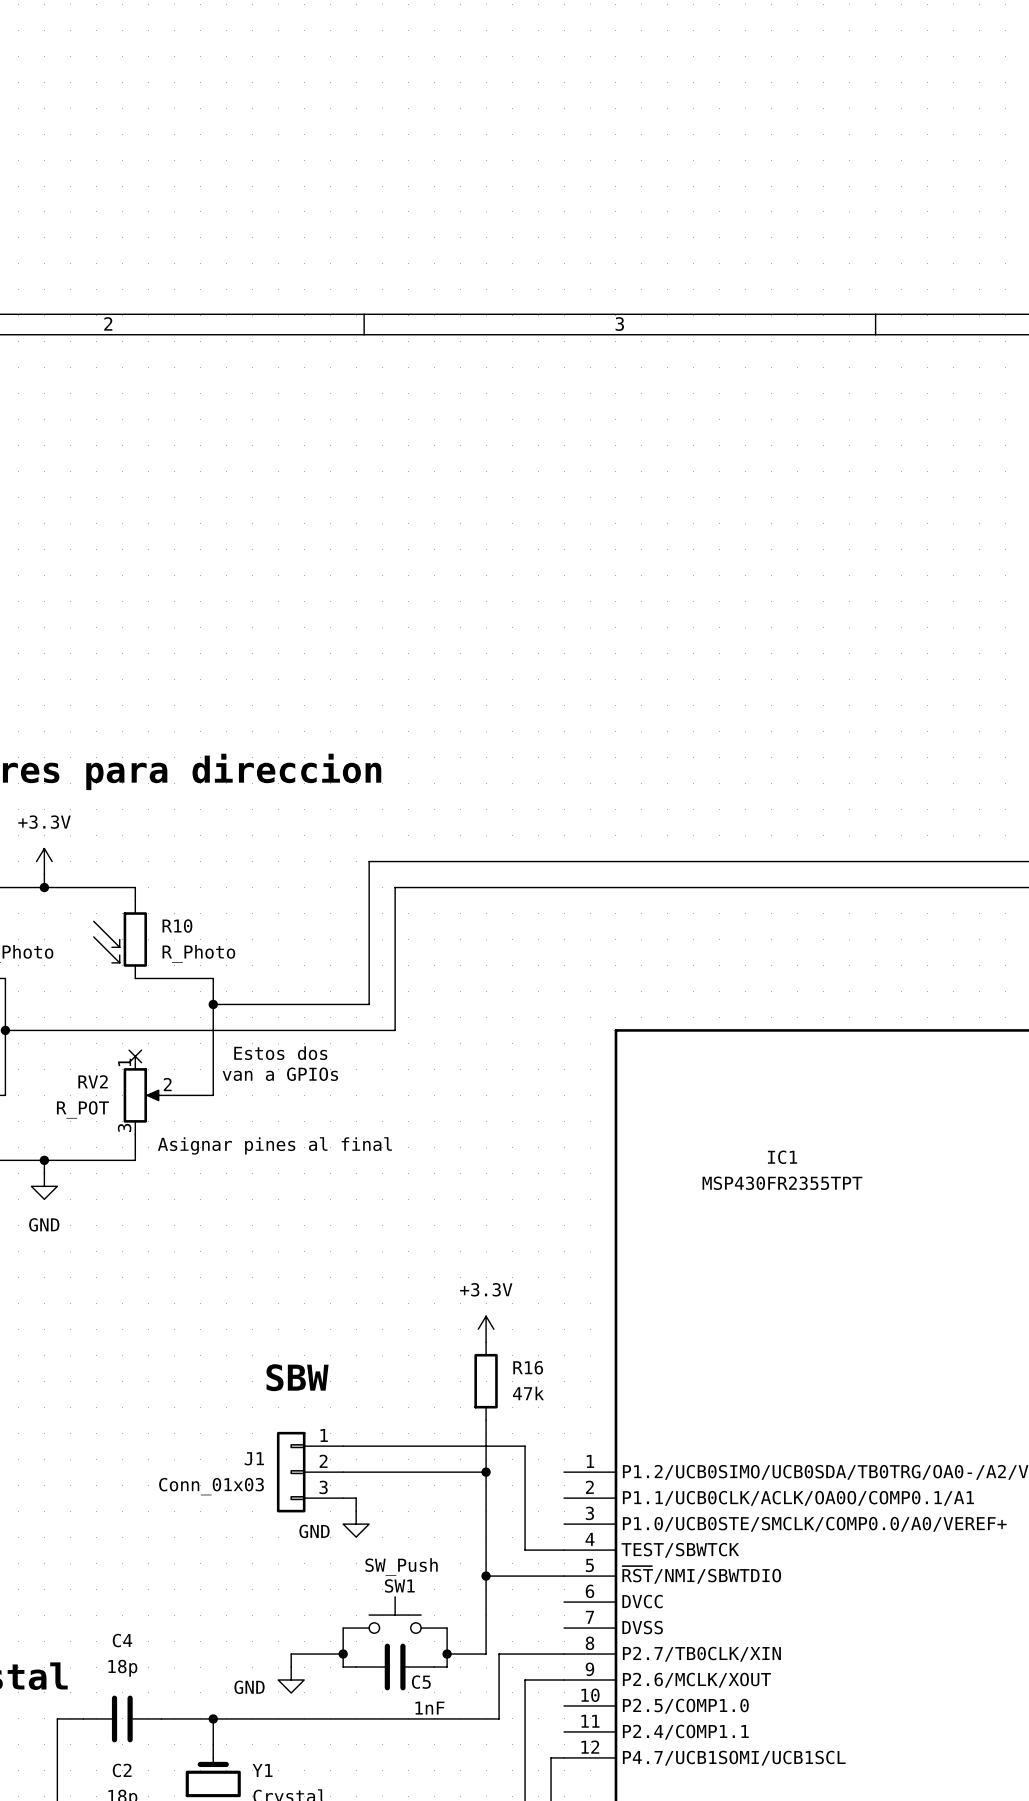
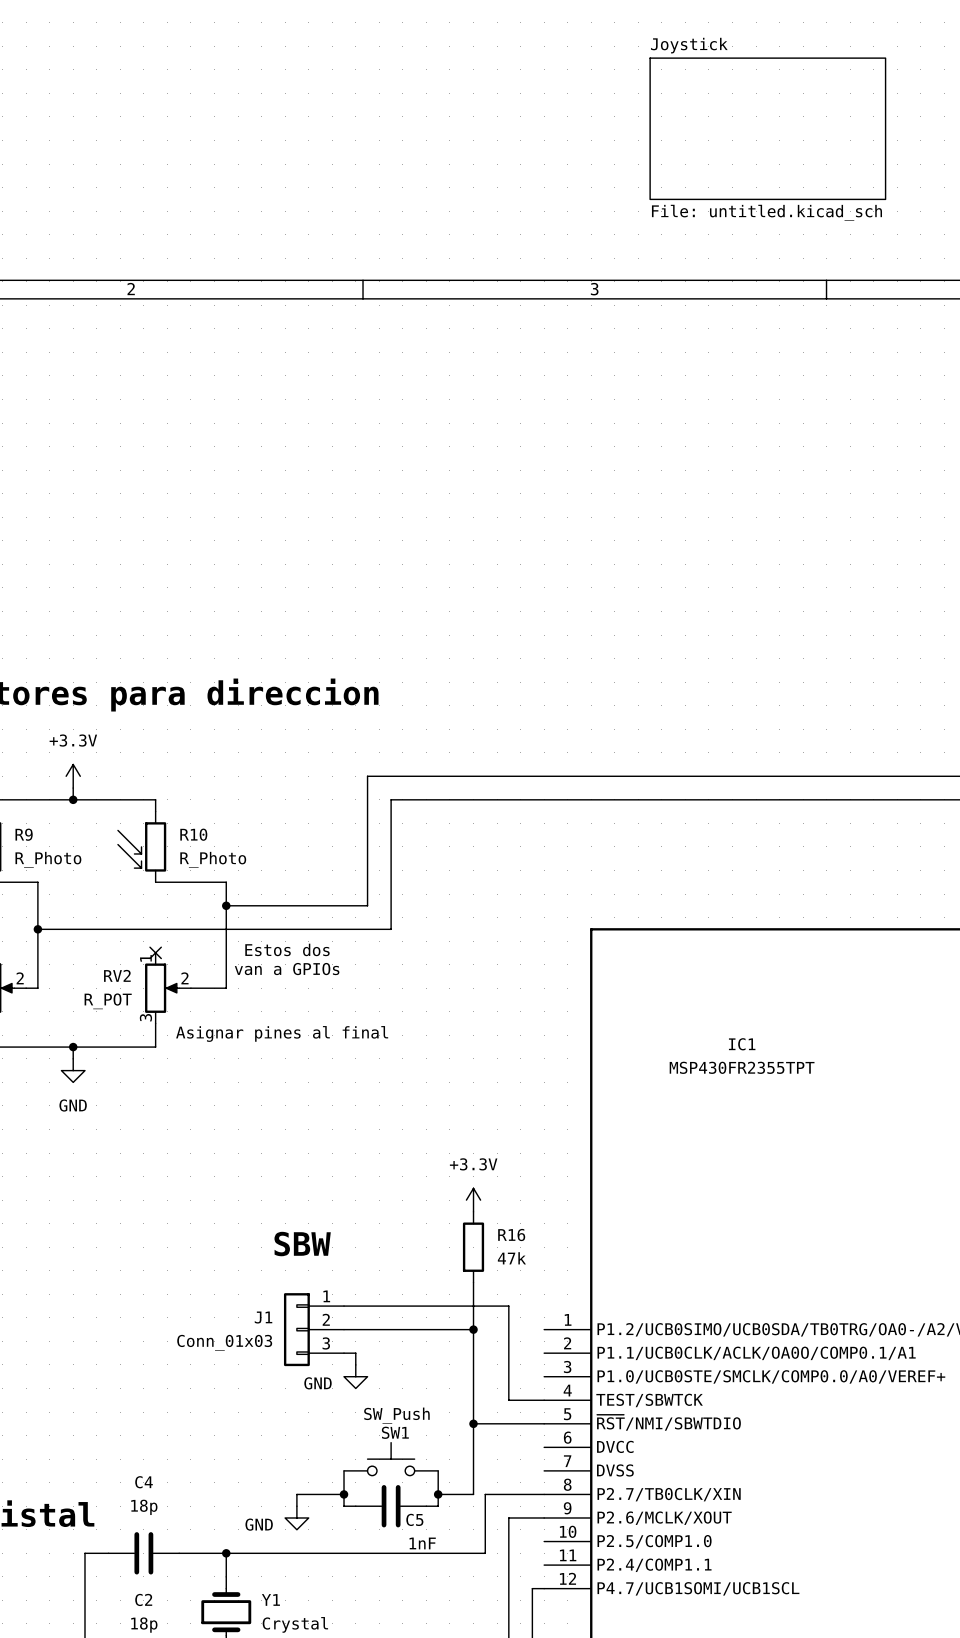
sheet Joystick: none -> File: untitled.kicad_sch (767, 128)

